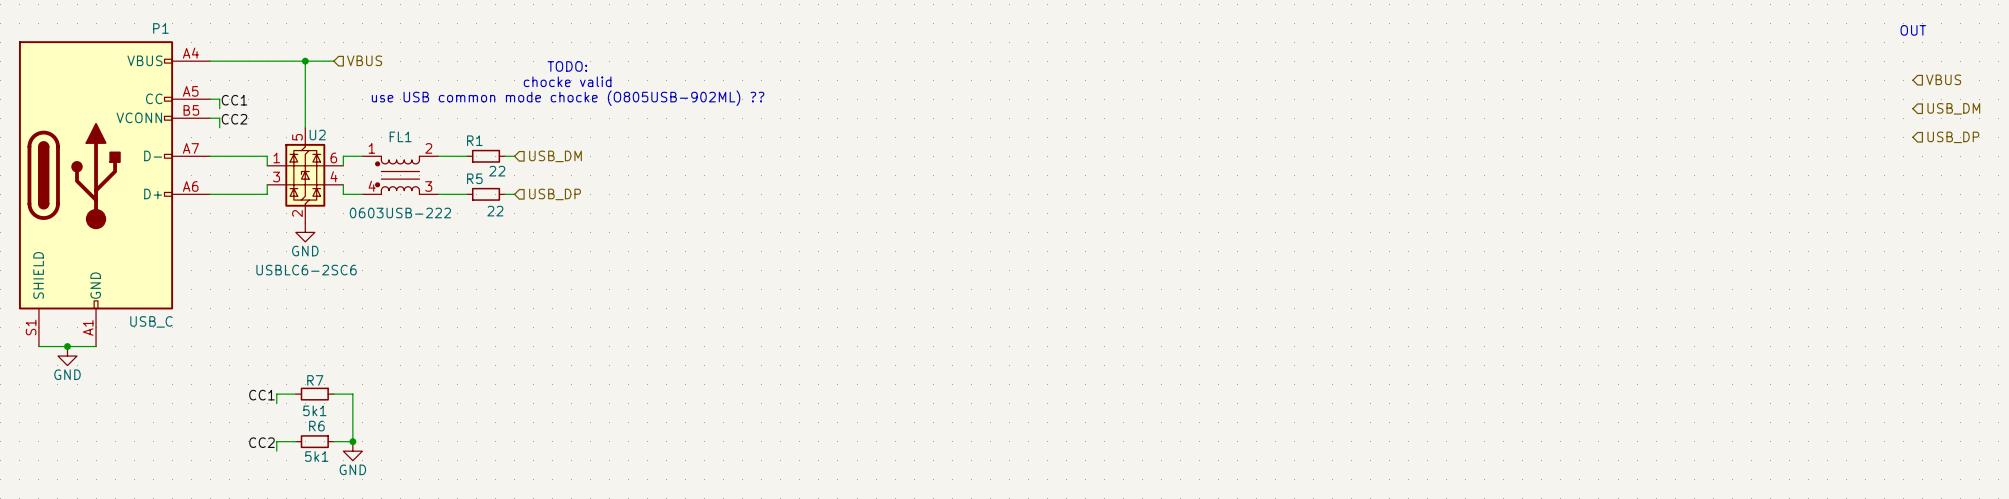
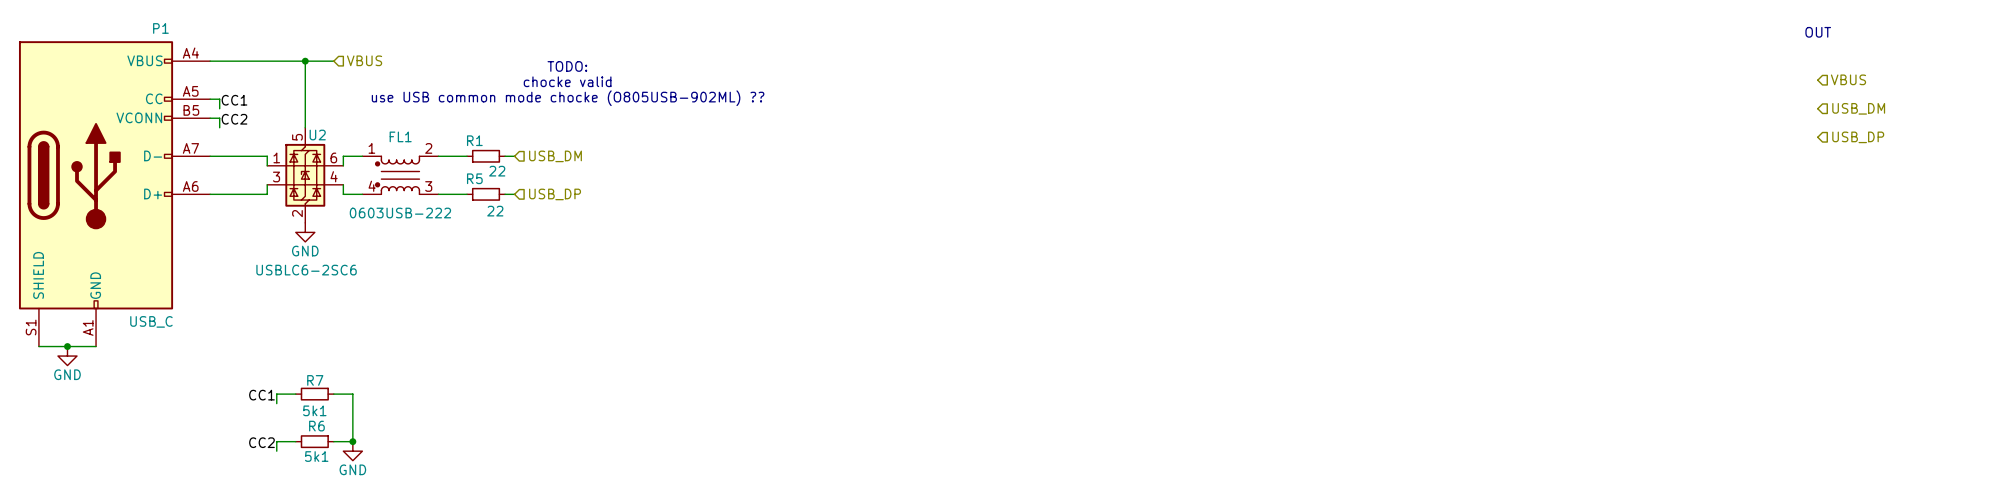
text position: OUT (1913, 30) -> OUT (1818, 32)
hierarchical label position: VBUS (1943, 79) -> VBUS (1848, 79)
hierarchical label position: USB_DM (1953, 108) -> USB_DM (1858, 108)
hierarchical label position: USB_DP (1953, 137) -> USB_DP (1858, 137)

